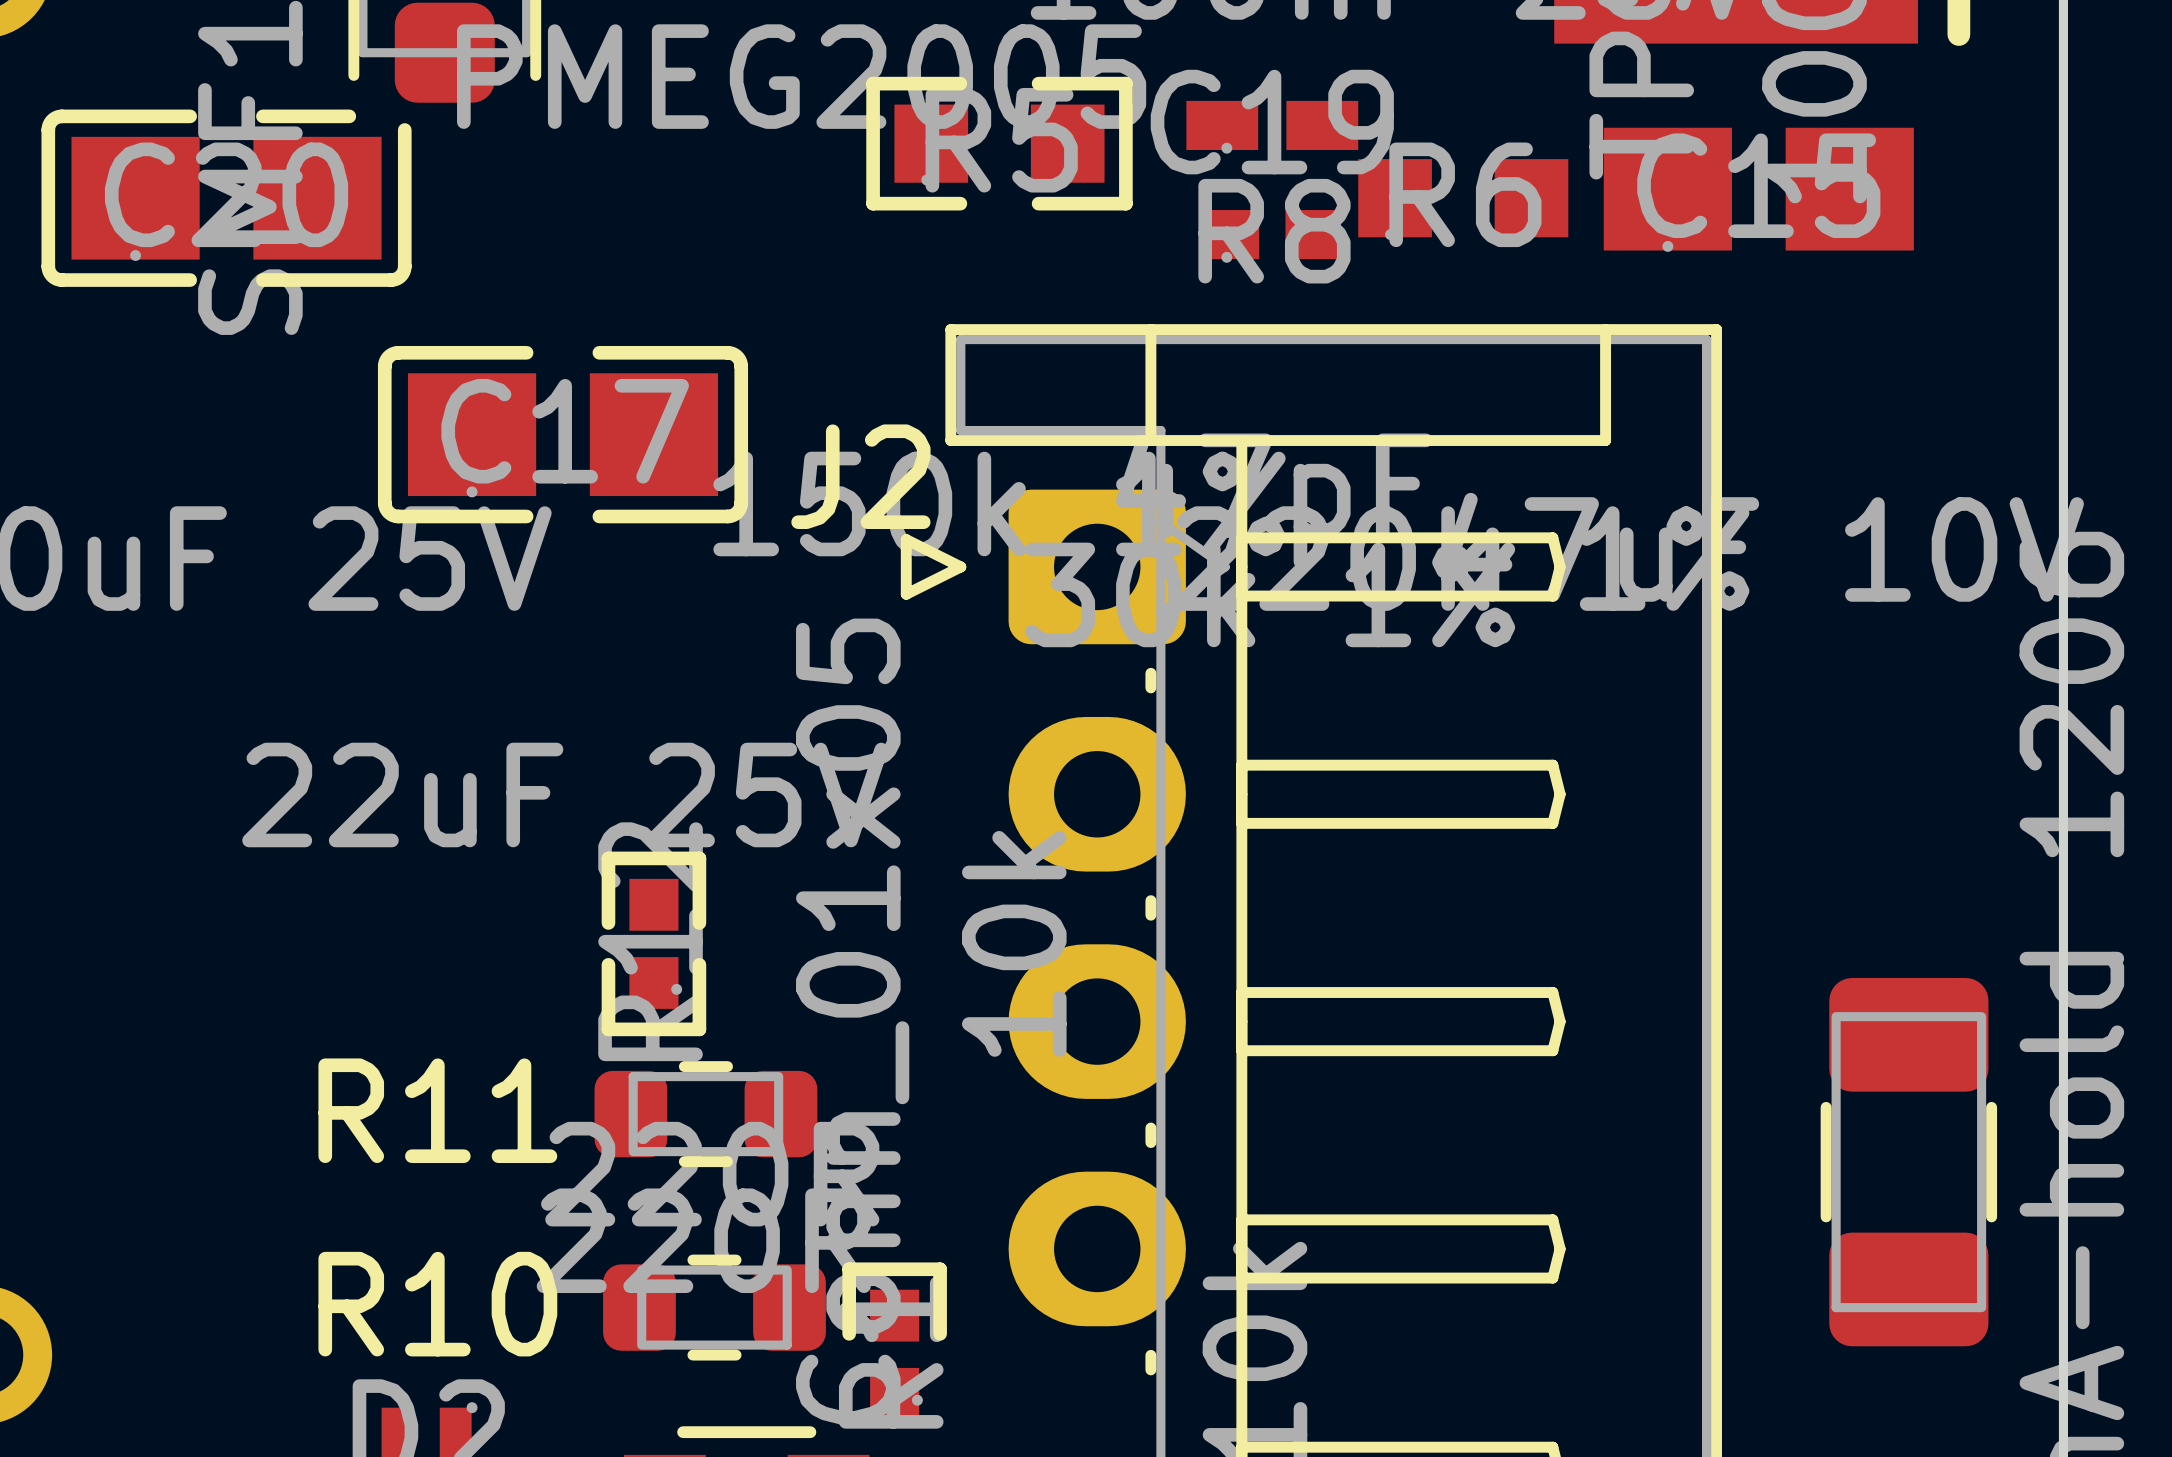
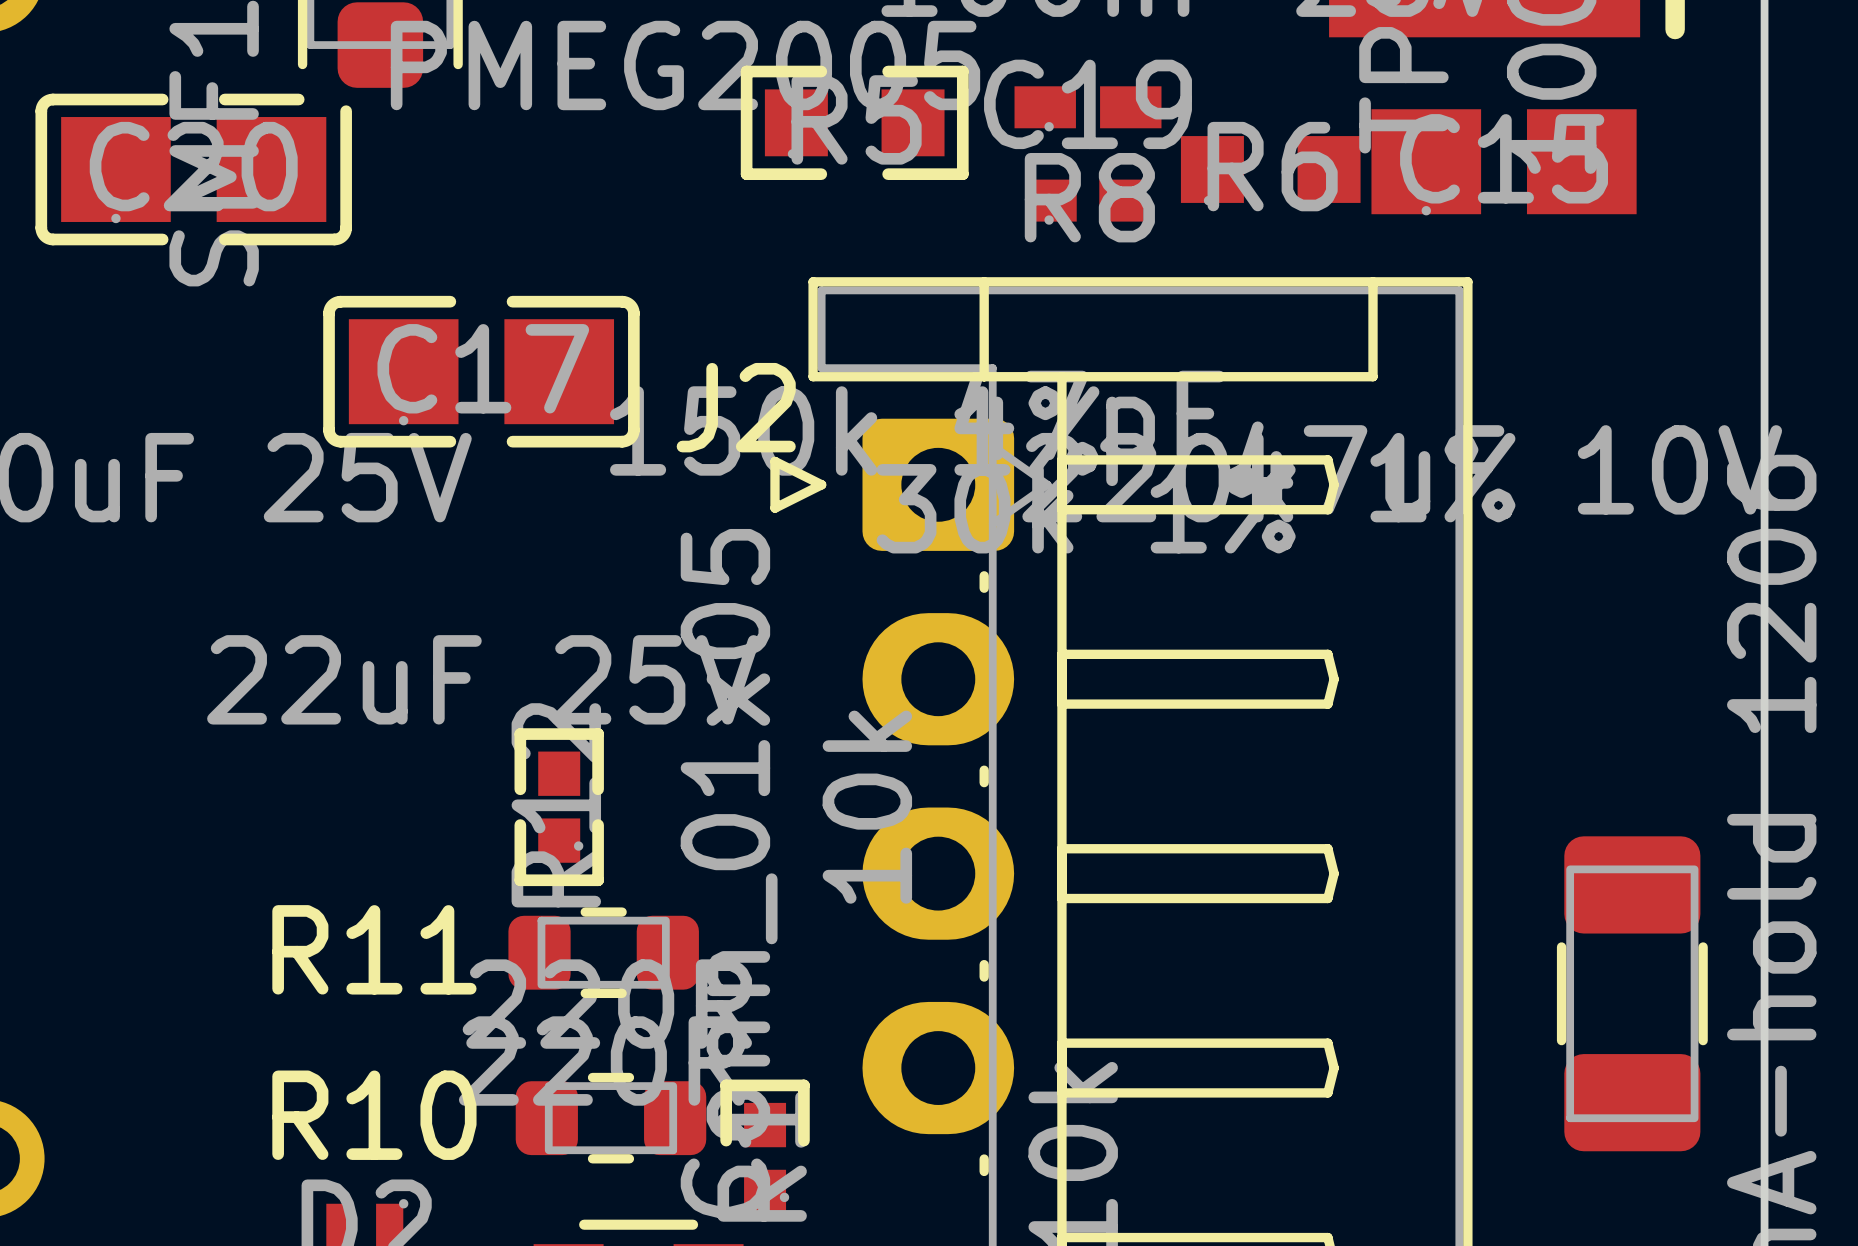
R6 position: (1463, 199) -> (1270, 170)

